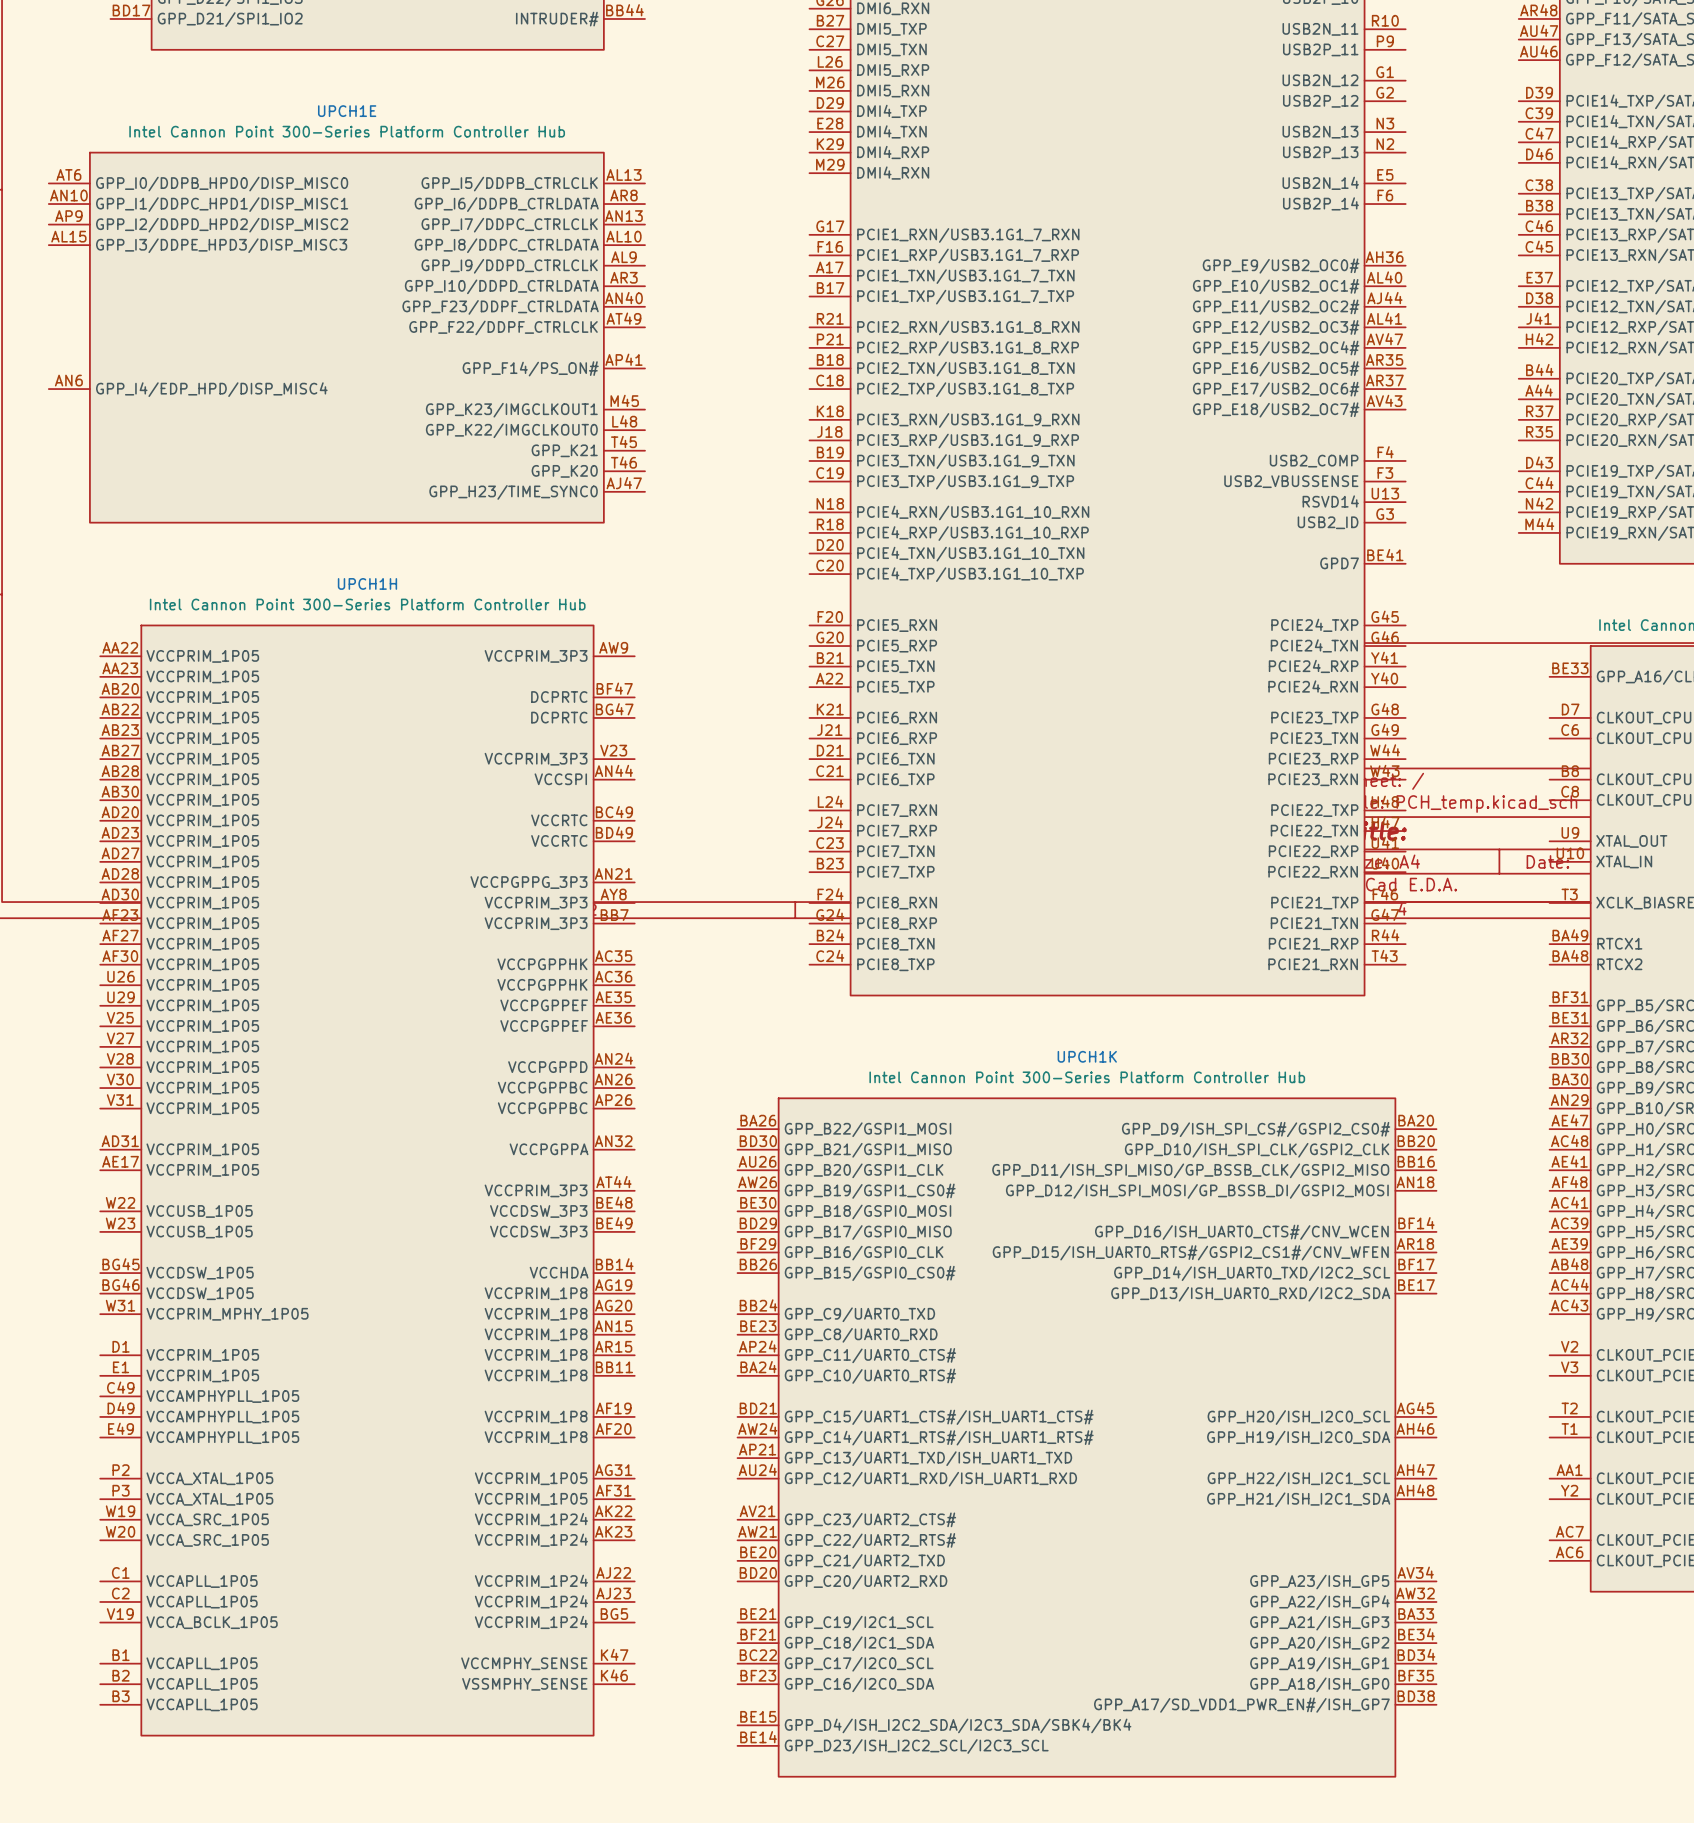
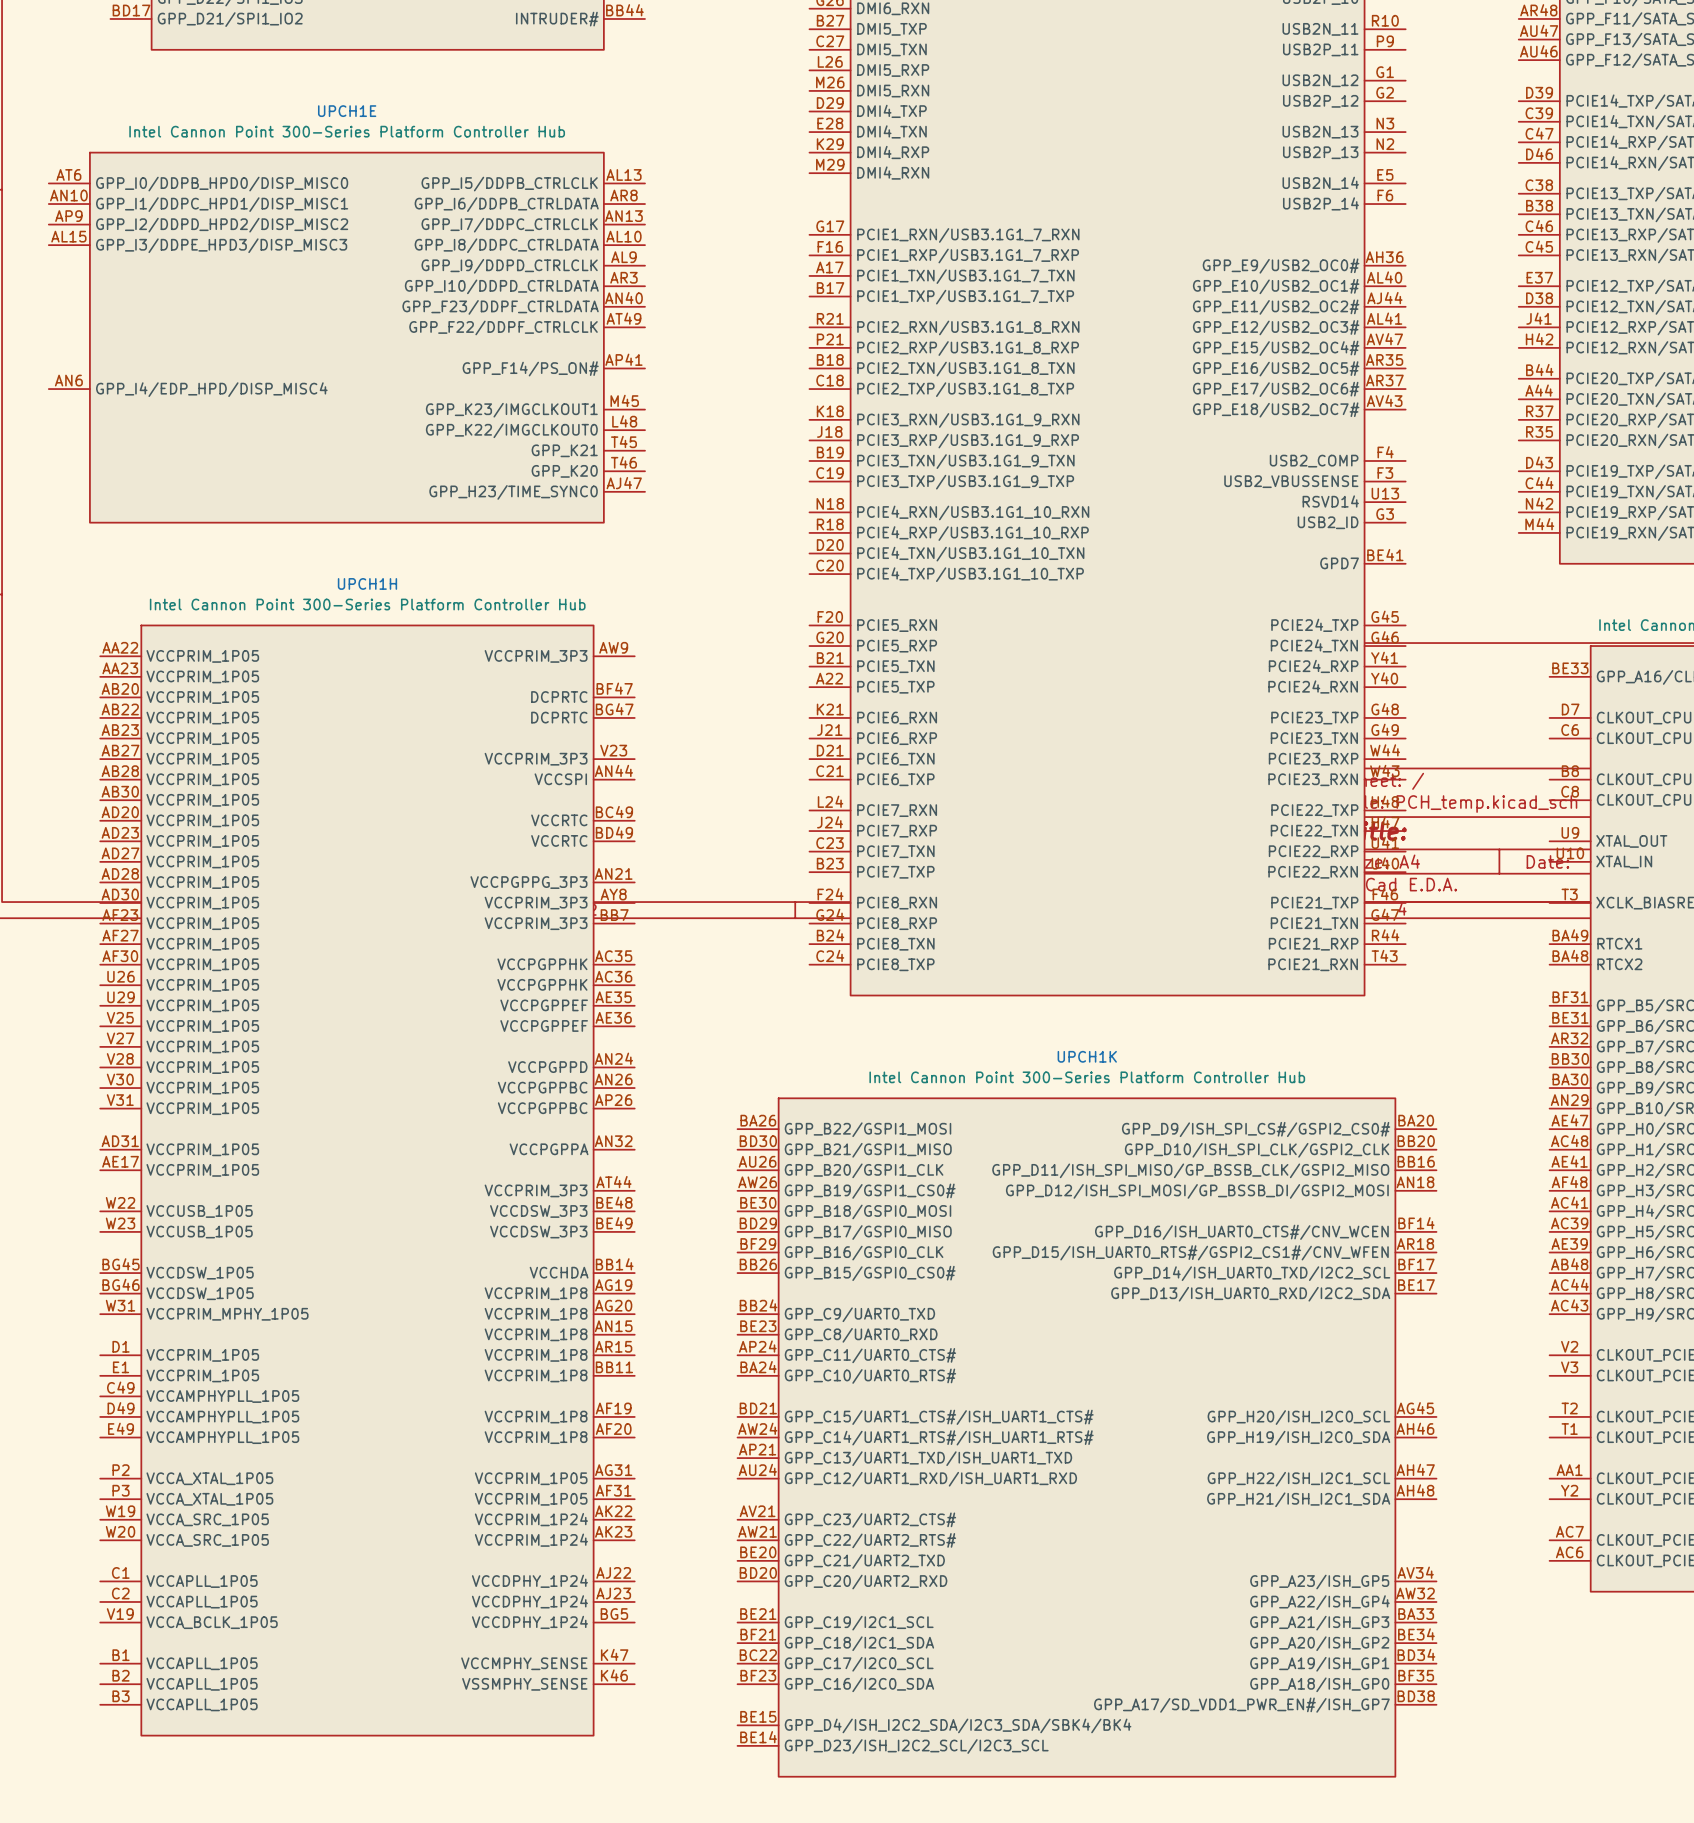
UPCH1H pin name: VCCPRIM_1P24 (531, 1581) -> VCCDPHY_1P24 (529, 1581)
UPCH1H pin name: VCCPRIM_1P24 (531, 1601) -> VCCDPHY_1P24 (529, 1601)
UPCH1H pin name: VCCPRIM_1P24 (531, 1622) -> VCCDPHY_1P24 (529, 1622)

